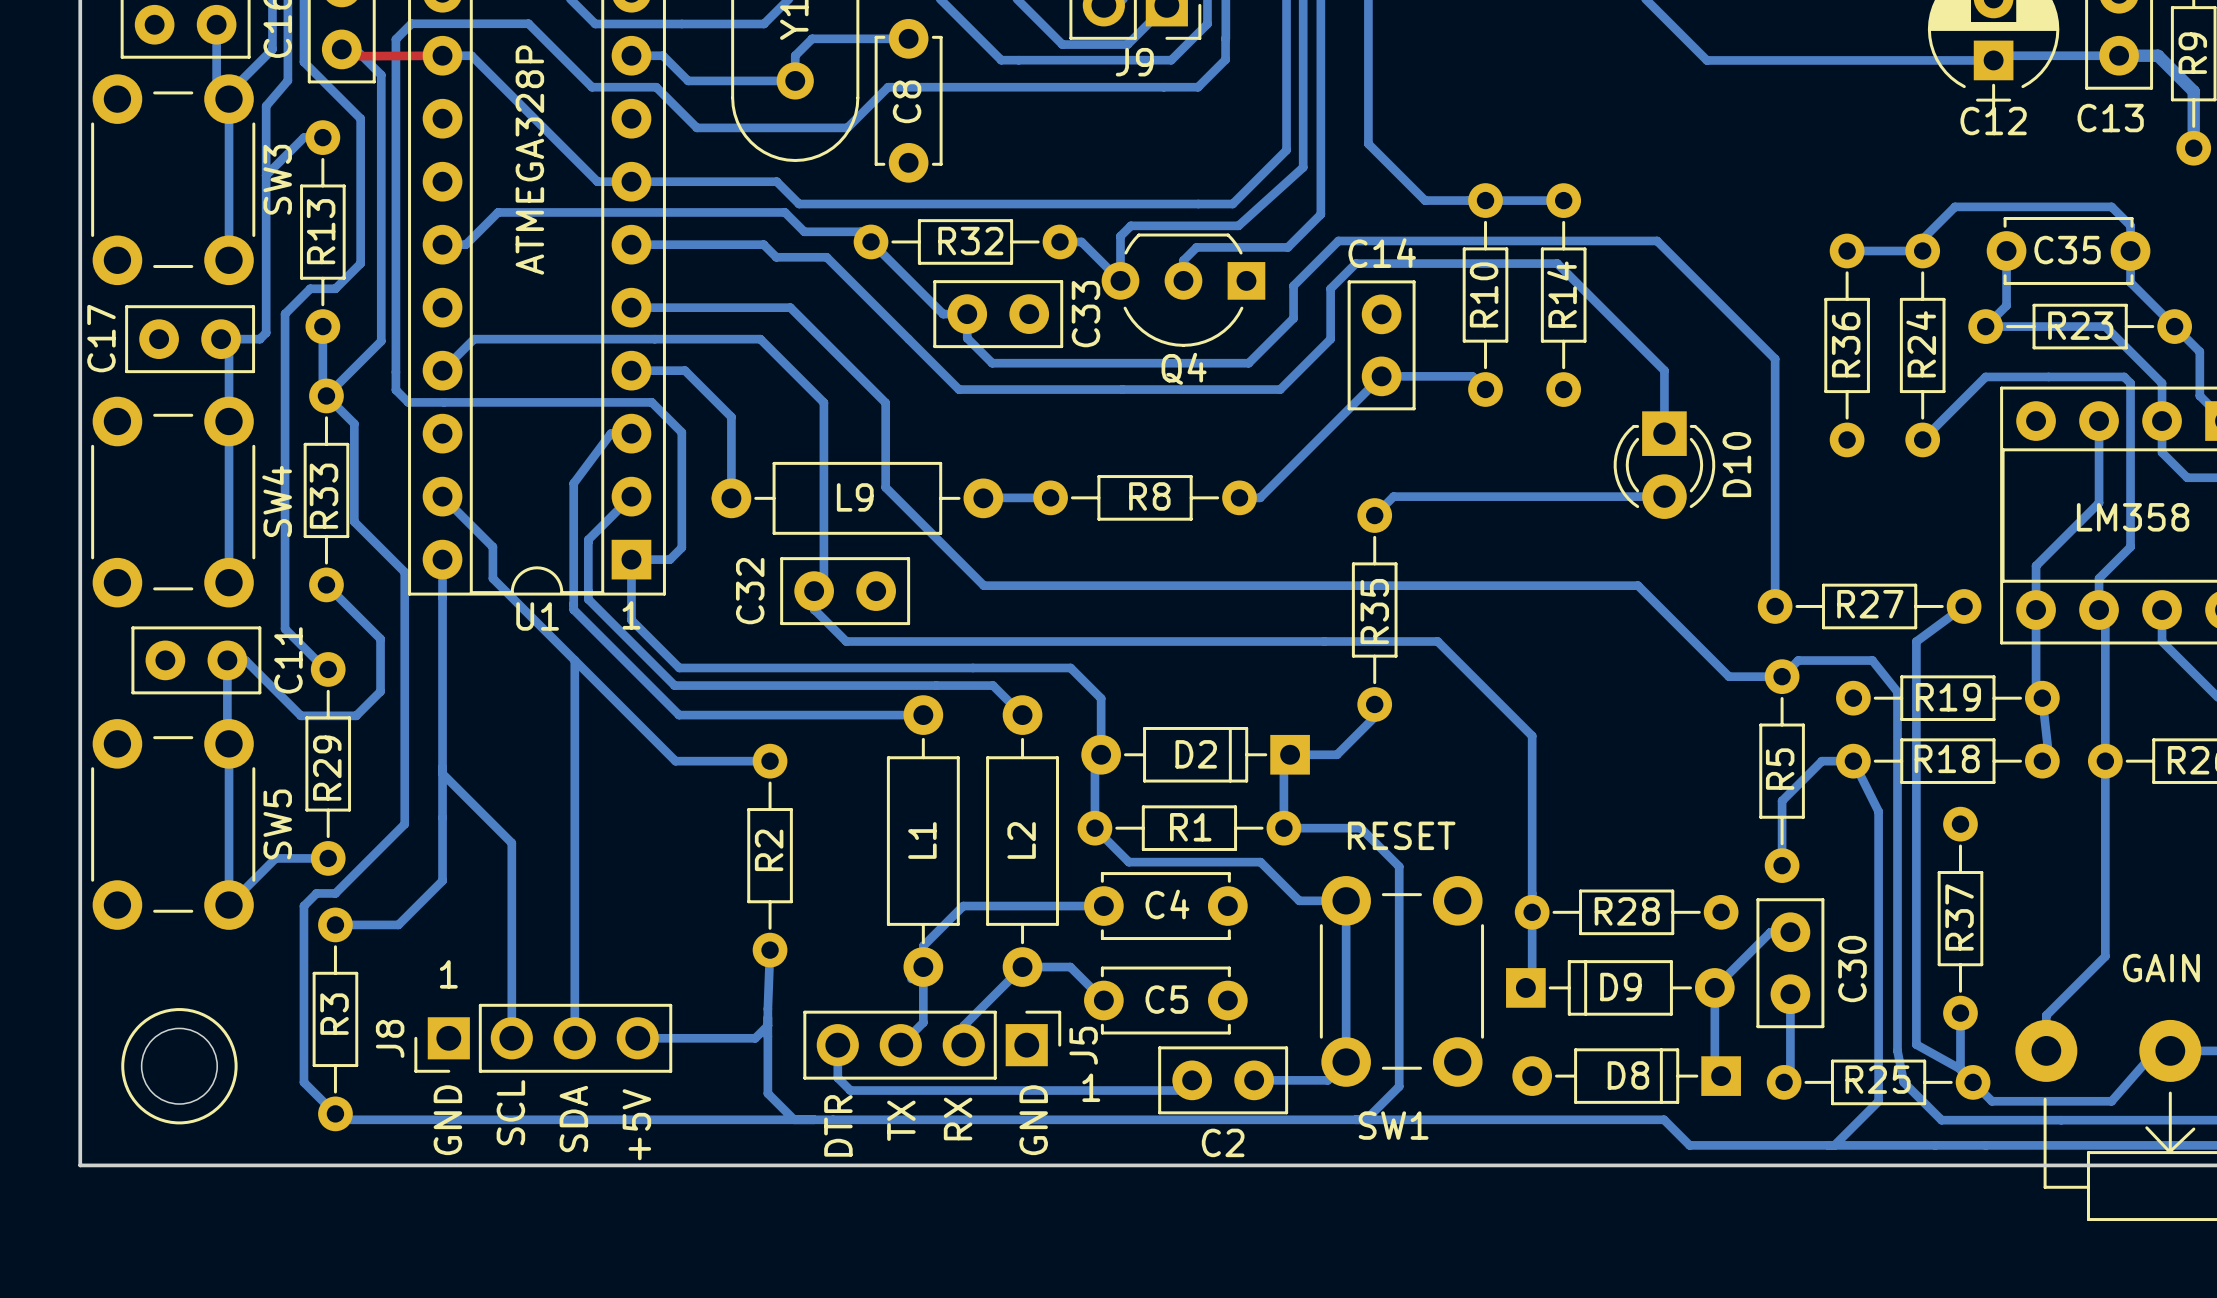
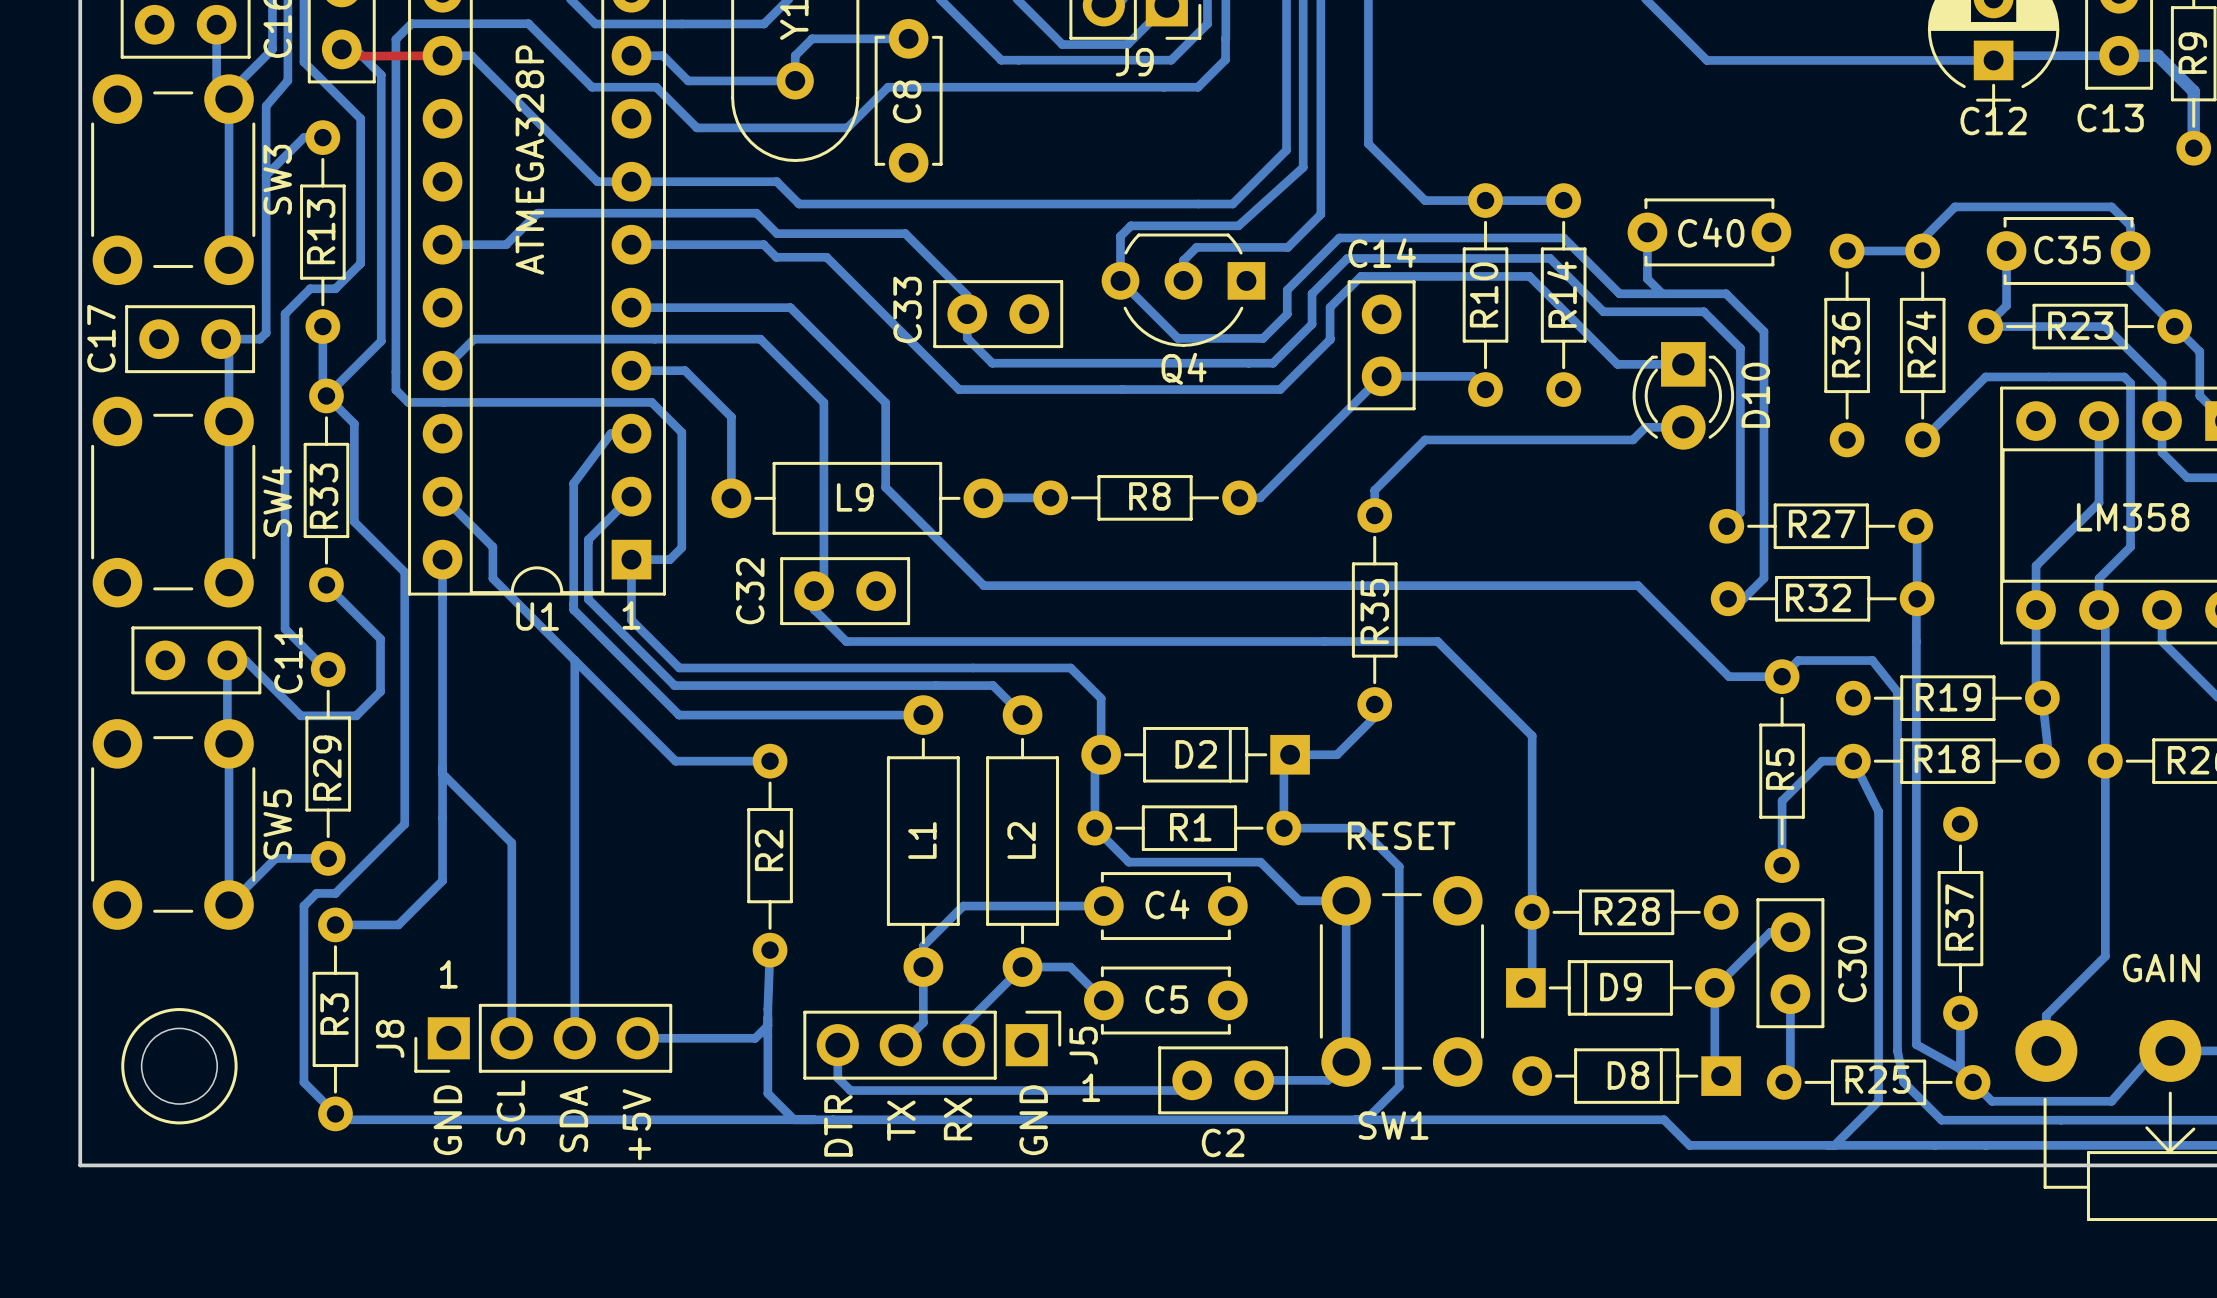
bottom track: none -> (1647, 232) (1647, 278) (1662, 293)
C40: none -> (1709, 232)
R32 position: (965, 241) -> (1822, 598)
R32 name position: R32 (970, 241) -> R32 (1818, 597)
bottom track: (1061, 243) (1059, 241) (1081, 241) (1120, 280) -> (1728, 598) (1743, 598) (1763, 578) (1763, 331) (1726, 293) (1619, 293) (1563, 237) (1339, 237) (1287, 290) (1287, 314) (1263, 338) (1178, 338) (1120, 280)
bottom track: (465, 244) (498, 212) (784, 212) (804, 231) (860, 231) (943, 314) (967, 314) -> (465, 244) (506, 244) (537, 213) (756, 213) (777, 233) (905, 233) (967, 295) (967, 314)
C33 name position: C33 (1085, 314) -> C33 (907, 309)
bottom track: (1330, 339) (1330, 288) (1355, 263) (1557, 263) (1664, 370) (1664, 433) -> (1330, 339) (1330, 307) (1361, 276) (1529, 276) (1617, 364) (1683, 364)
bottom track: (1248, 363) (1293, 318) (1293, 285) (1338, 240) (1657, 240) (1775, 359) (1775, 606) -> (1248, 363) (1272, 363) (1312, 324) (1312, 293) (1347, 258) (1550, 258) (1603, 311) (1703, 311) (1740, 348) (1740, 512) (1726, 526)
D10 position: (1664, 465) -> (1683, 395)
bottom track: (1664, 496) (1393, 496) (1374, 515) -> (1683, 427) (1645, 427) (1632, 439) (1425, 439) (1374, 490) (1374, 515)
bottom track: none -> (1915, 526) (1917, 598)
R27 position: (1869, 606) -> (1821, 526)
bottom track: (1964, 606) (1916, 641) -> (1916, 597) (1916, 641)

